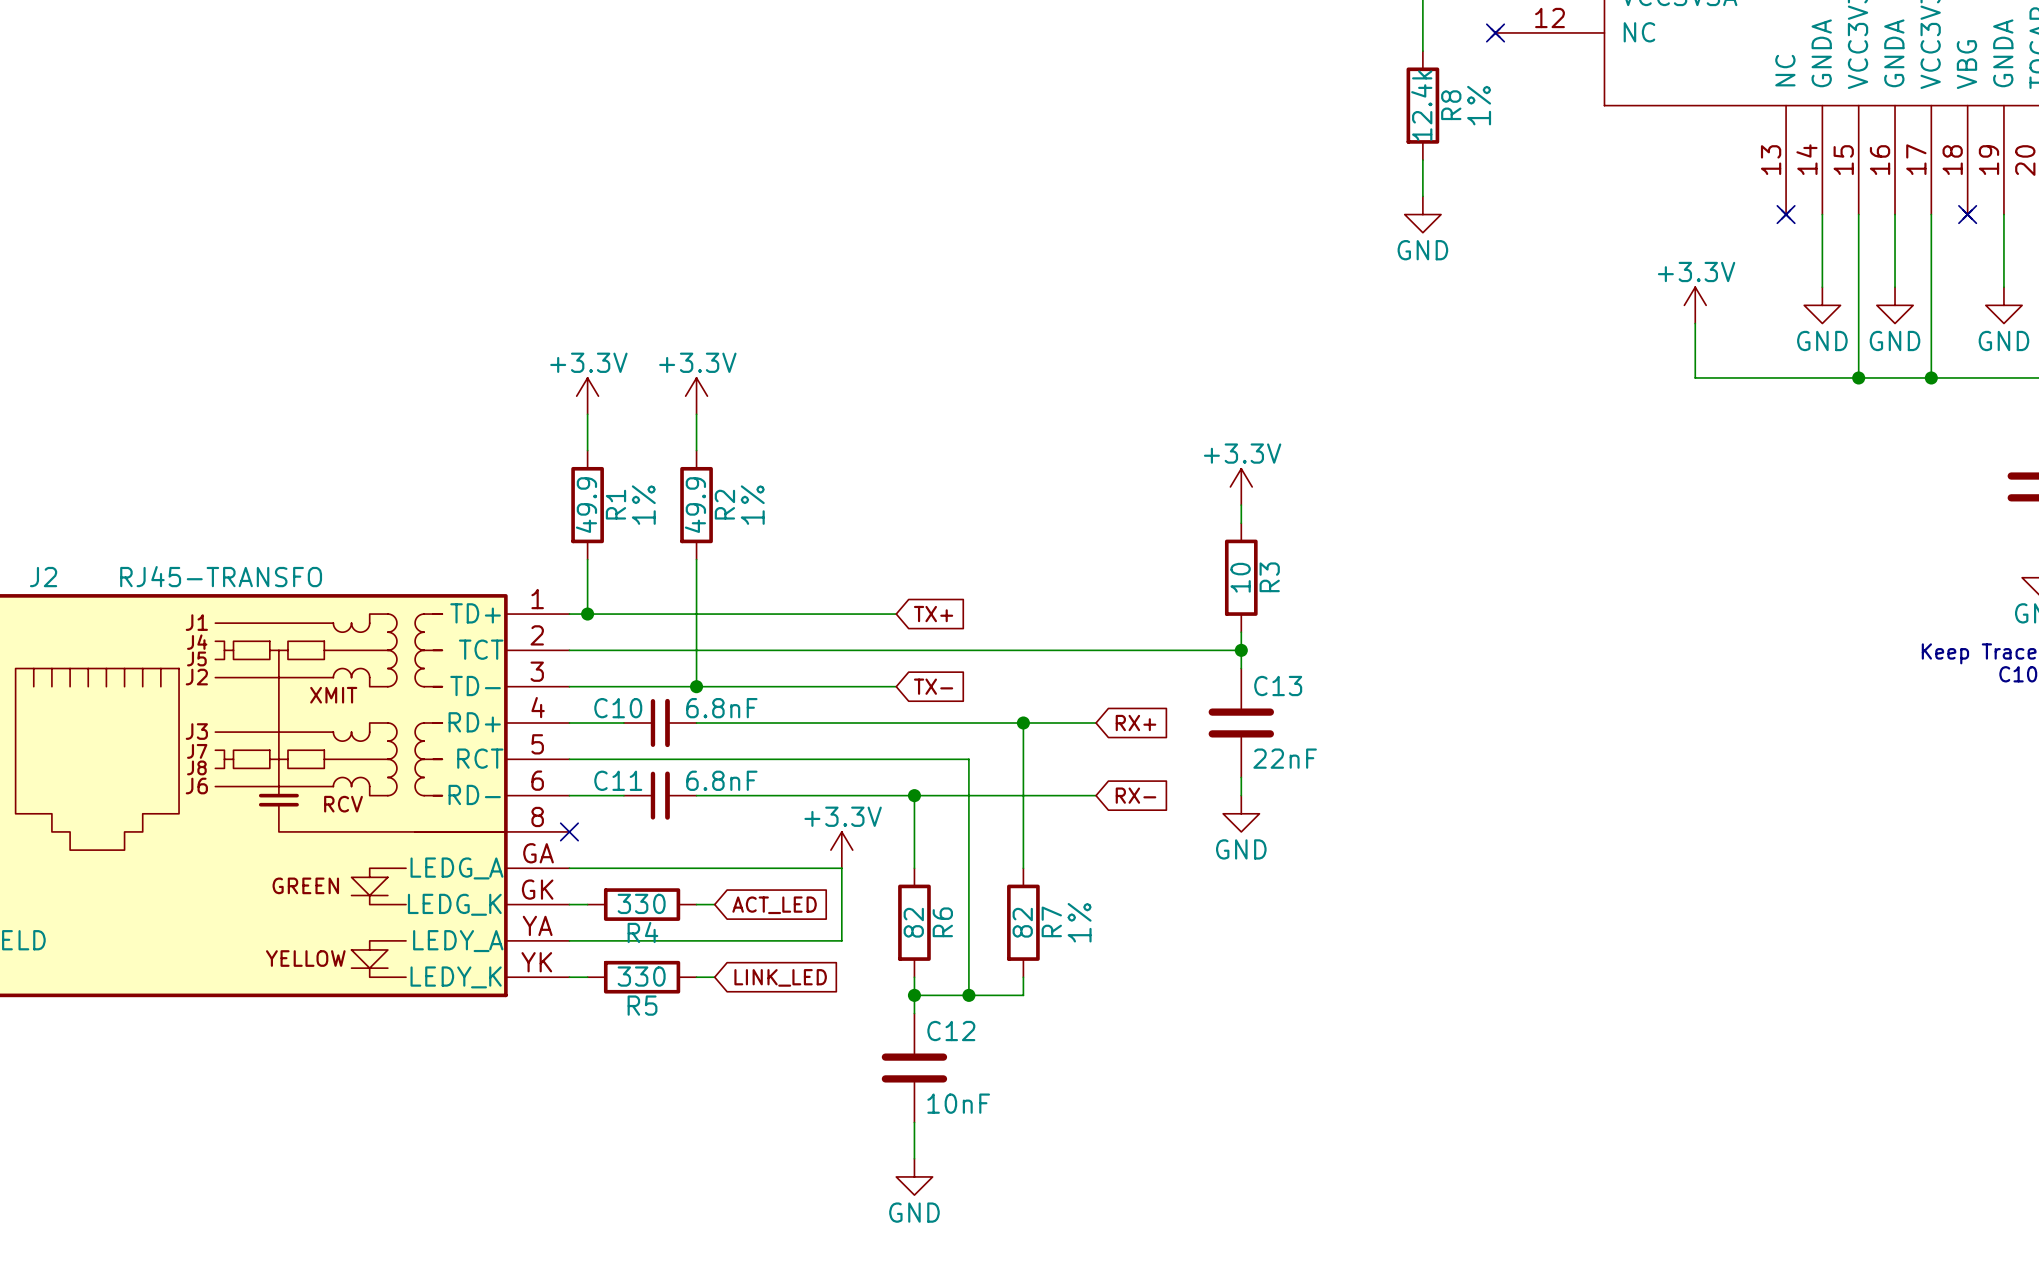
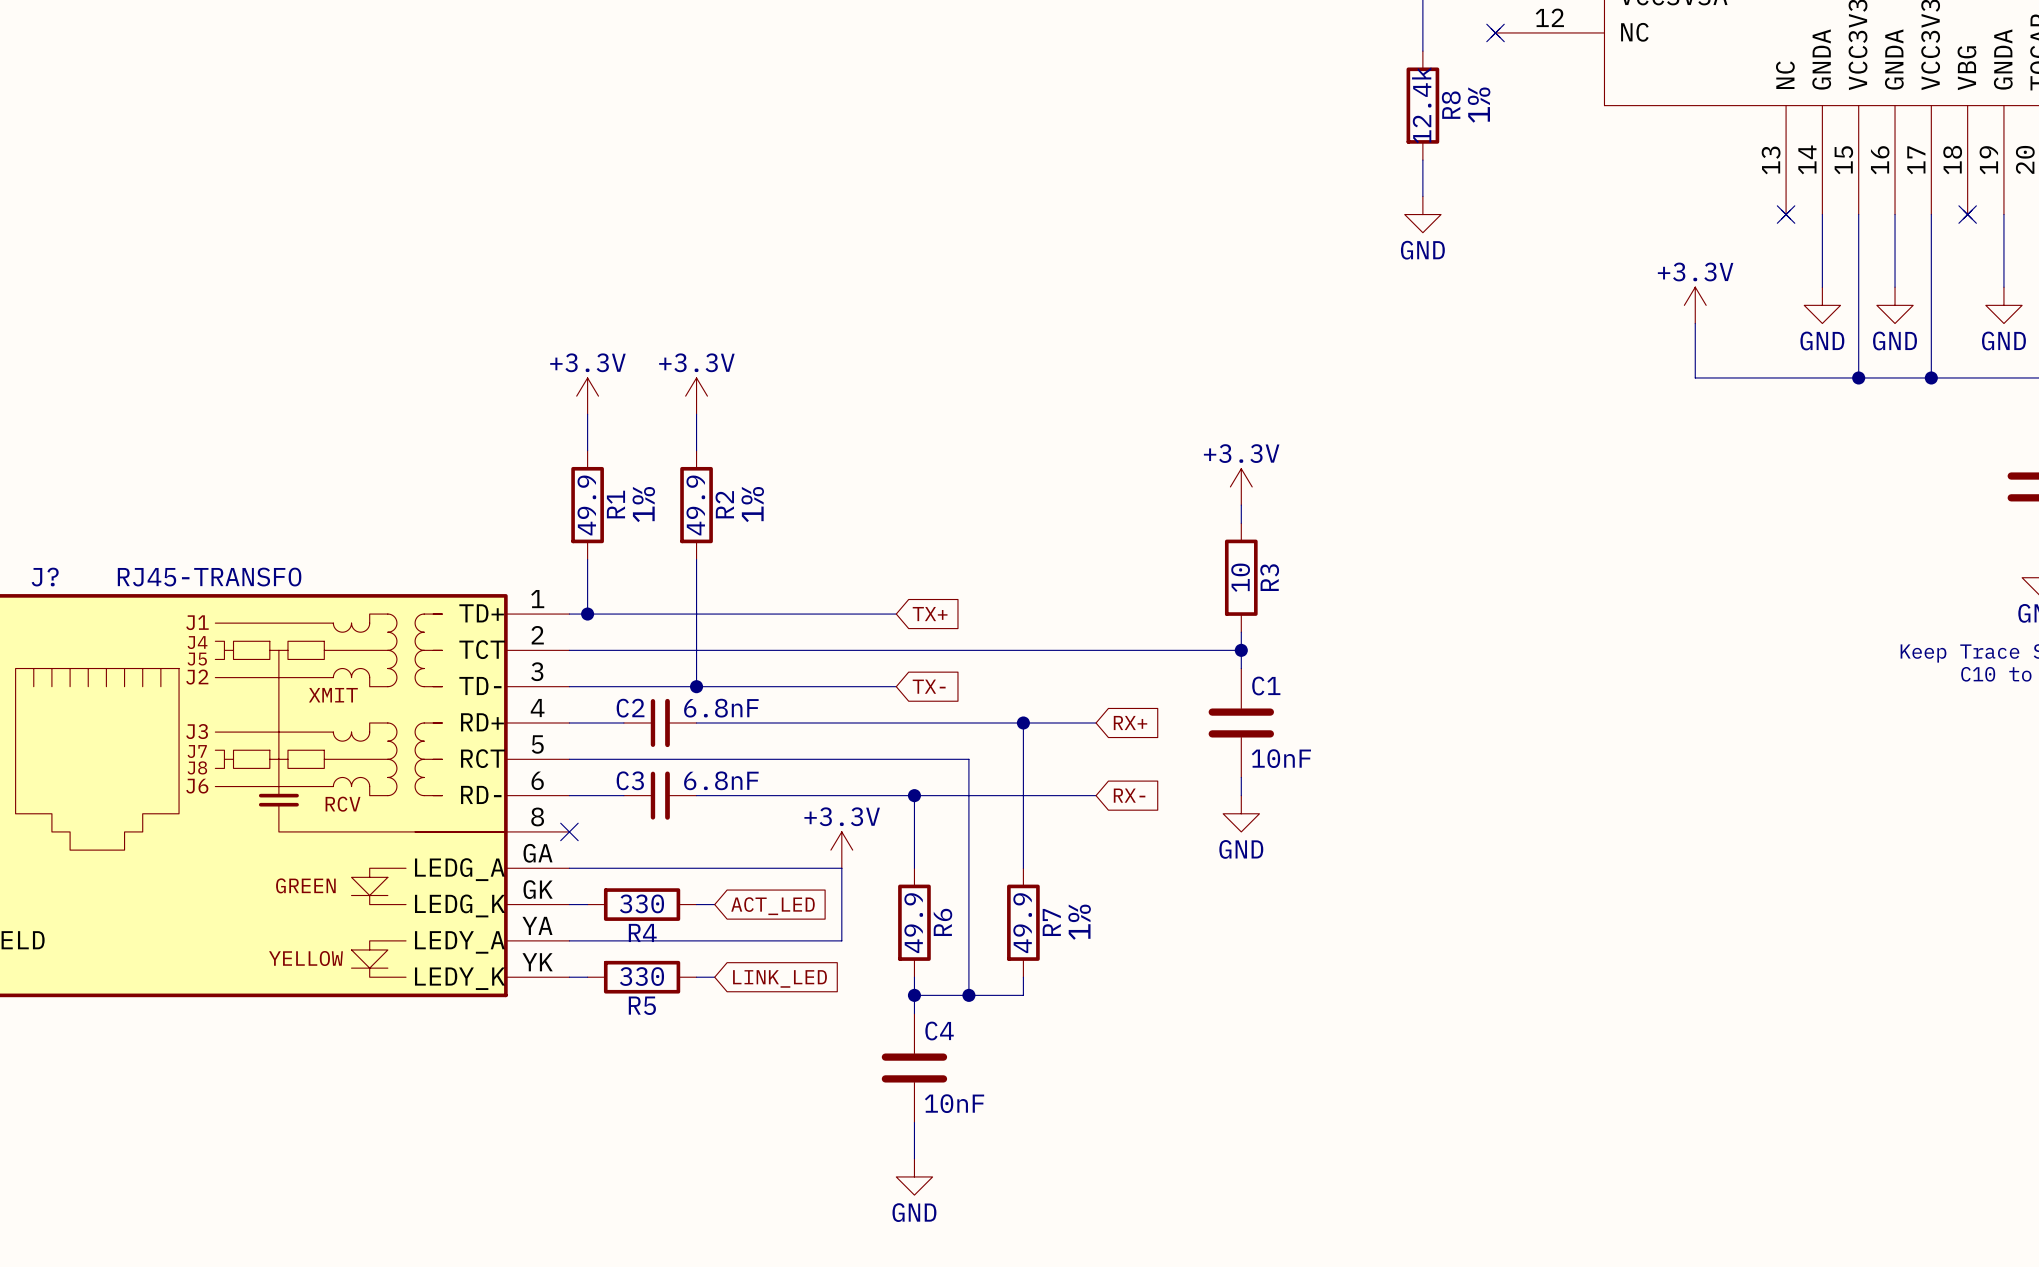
J2 name: J2 (43, 577) -> J? (45, 577)
C13 name: C13 (1278, 686) -> C1 (1266, 686)
C10 name: C10 (618, 708) -> C2 (630, 708)
C13 value: 22nF (1285, 758) -> 10nF (1281, 758)
C11 name: C11 (618, 780) -> C3 (630, 780)
R6 value: 82 (913, 922) -> 49.9 (913, 923)
R7 value: 82 (1022, 922) -> 49.9 (1022, 923)
C12 name: C12 (951, 1031) -> C4 (939, 1031)

